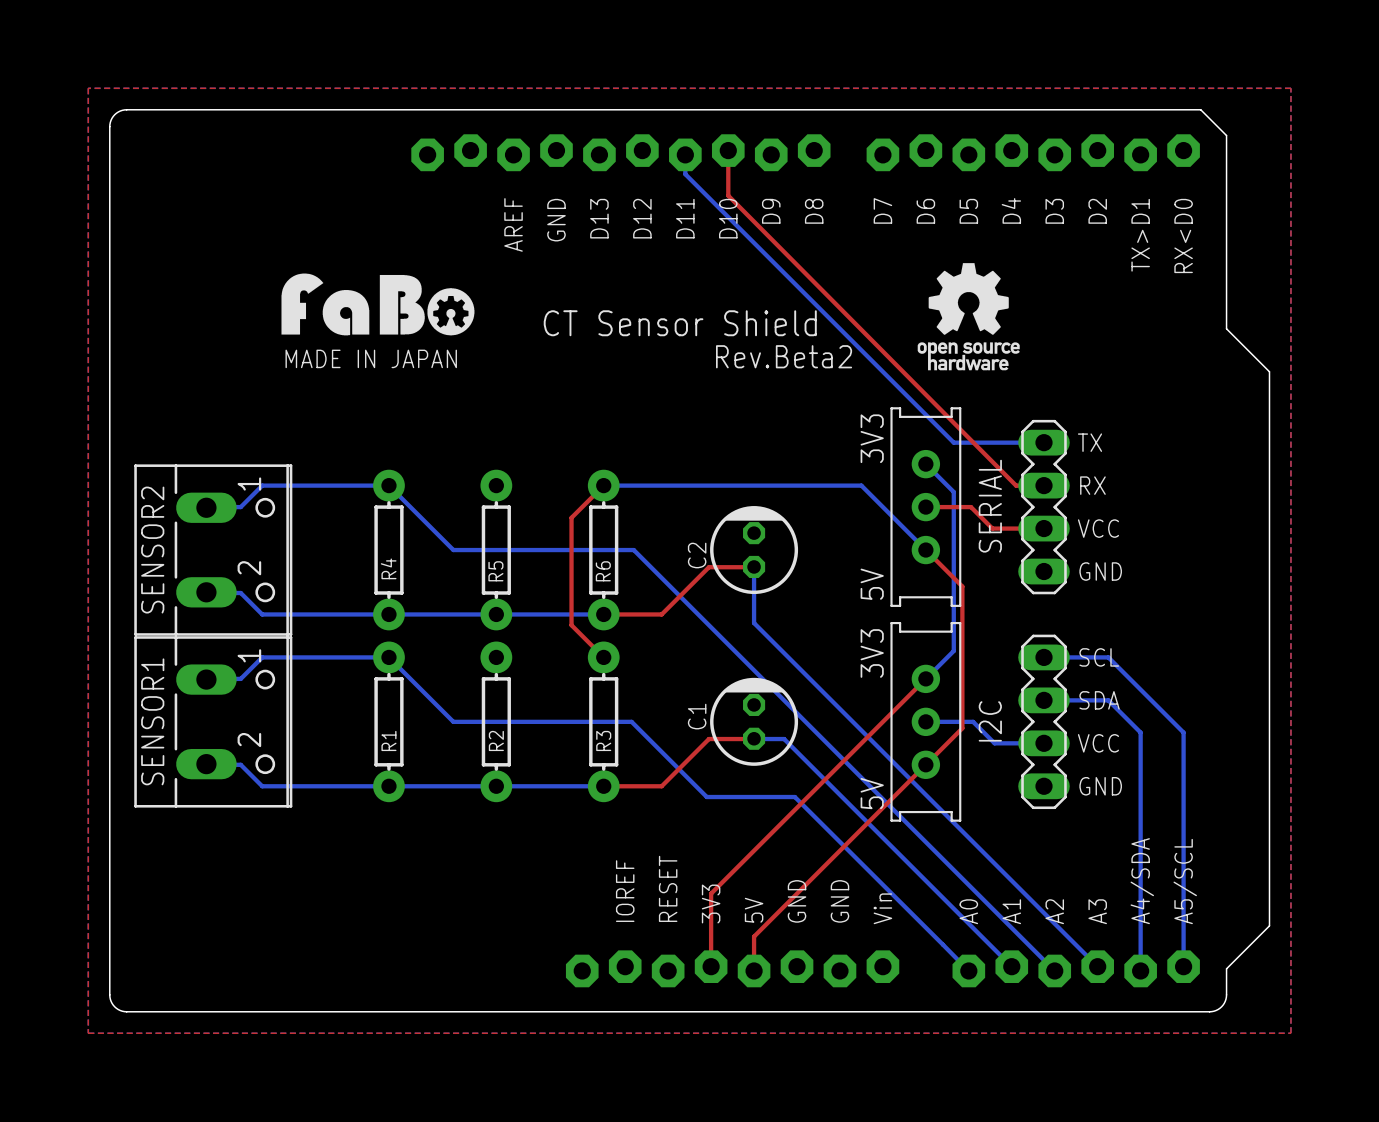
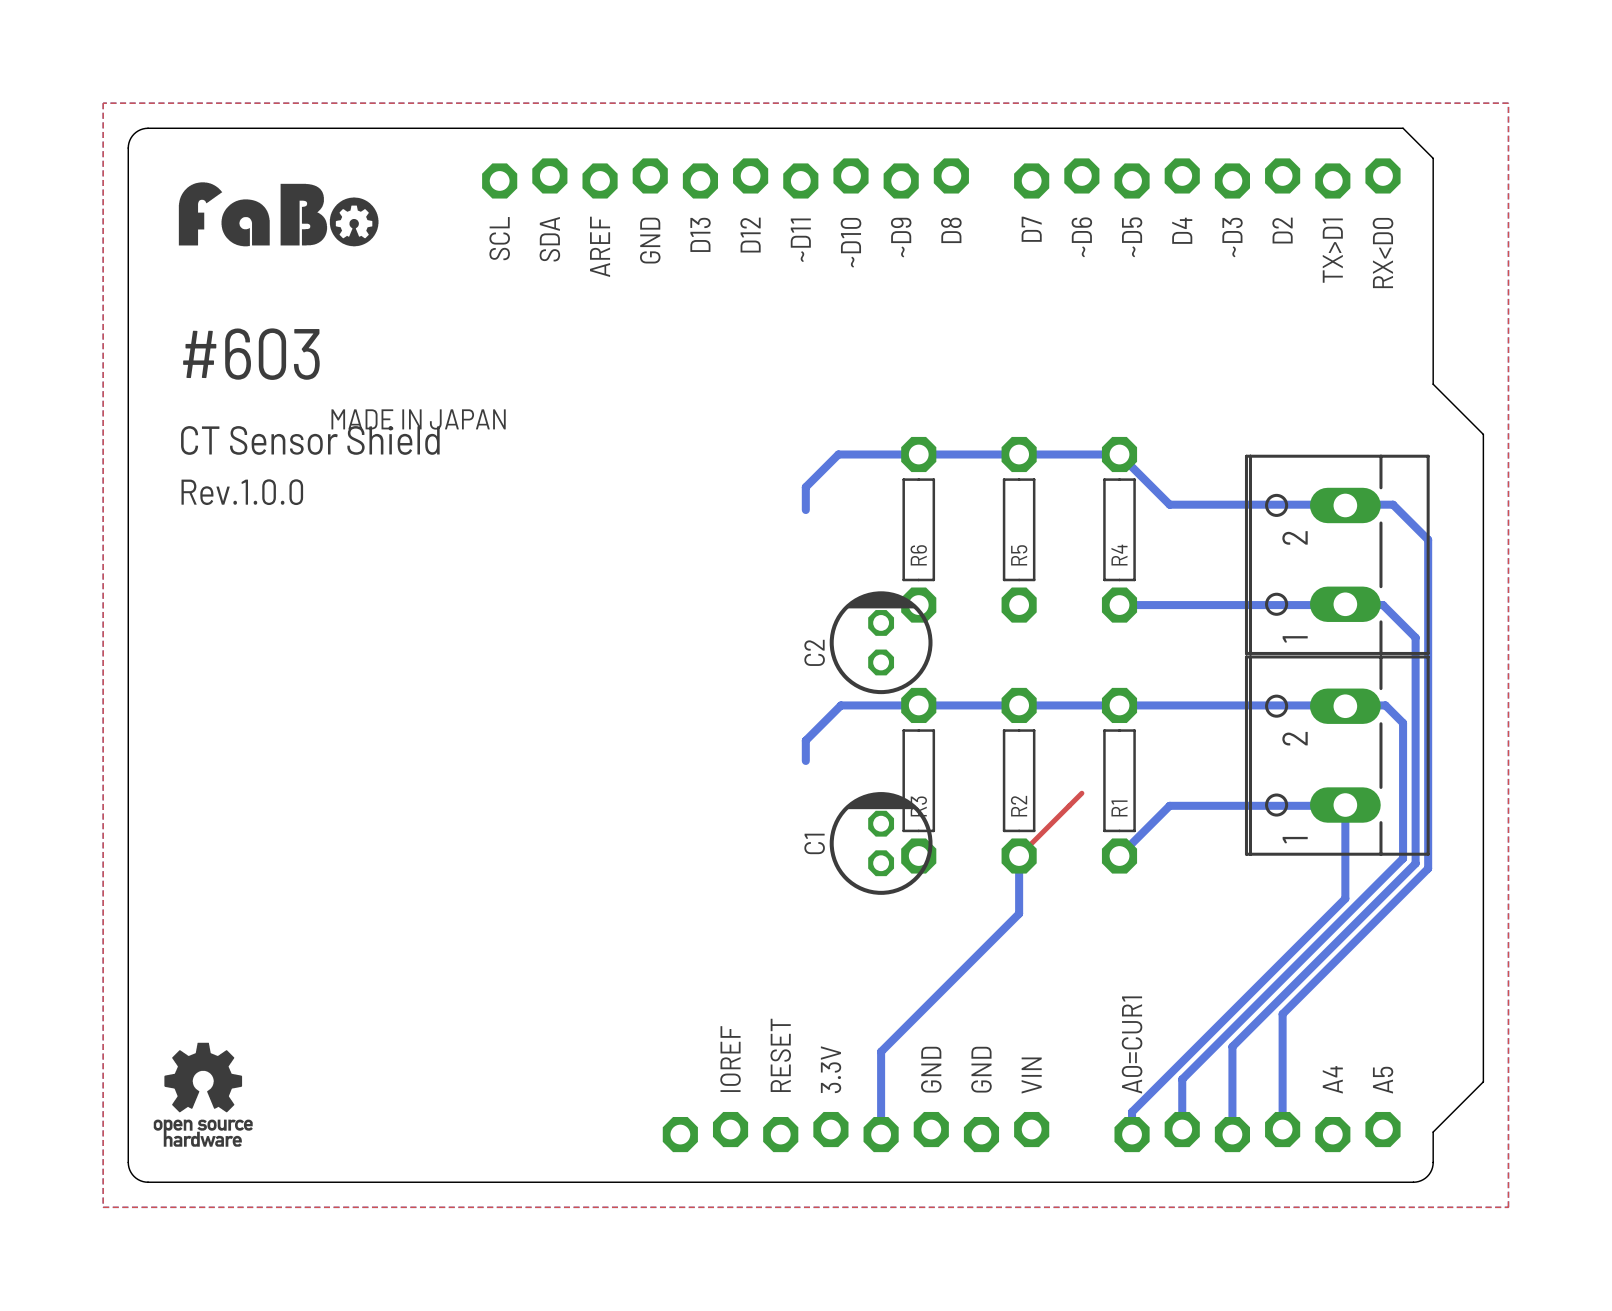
part footprint: [109, 109, 1270, 1012] -> [128, 128, 1484, 1183]
top track: (728, 150) (728, 195) (1016, 485) (1043, 485) -> none
bottom track: (685, 154) (685, 174) (953, 442) (1043, 442) -> none
drawing: none -> [178, 182, 379, 247]
text: none -> D7 (1031, 229)
text: none -> D4 (1182, 230)
text: none -> D8 (951, 230)
text: none -> D2 (1282, 230)
text: none -> SCL (499, 238)
text: none -> SDA (549, 239)
text: none -> ~D9 (901, 237)
text: none -> ~D6 (1081, 237)
text: none -> ~D5 (1132, 237)
text: none -> ~D3 (1232, 237)
text: none -> D13 (700, 234)
text: none -> D12 (750, 235)
text: none -> GND (650, 240)
text: none -> AREF (600, 246)
text: none -> ~D11 (800, 240)
text: none -> ~D10 (851, 242)
text: none -> TX>D1 (1332, 250)
text: none -> RX<D0 (1383, 253)
drawing: [917, 263, 1020, 371] -> none
drawing: [281, 273, 475, 336] -> none
text: none -> #603 (251, 354)
text position: CT Sensor Shield (680, 323) -> CT Sensor Shield (310, 440)
text: Rev.Beta2 (784, 356) -> none
text: none -> Rev.1.0.0 (242, 492)
text: 3V3 (872, 438) -> none
text: TX (1090, 442) -> none
bottom track: (925, 464) (953, 492) (953, 650) (925, 678) -> none
R4 footprint: [373, 469, 405, 631] -> [1101, 436, 1138, 623]
R5 footprint: [480, 469, 513, 631] -> [1001, 436, 1037, 623]
R6 footprint: [587, 469, 620, 631] -> [901, 436, 937, 623]
part: none -> (1337, 554)
top track: (603, 485) (571, 517) (571, 625) (603, 657) -> none
bottom track: (603, 485) (861, 485) (925, 550) -> none
text: RX (1092, 485) -> none
text: SERIAL (990, 506) -> none
bottom track: (206, 507) (240, 507) (262, 485) (388, 485) (453, 550) (633, 550) (1054, 970) -> (1119, 605) (1382, 605) (1415, 637) (1415, 863) (1232, 1046) (1232, 1134)
top track: (925, 507) (970, 507) (992, 528) (1043, 528) -> none
part: (925, 507) -> none
part: (1043, 507) -> none
text: VCC (1098, 528) -> none
text: SENSOR2 (152, 550) -> none
part: (213, 550) -> none
top track: (925, 550) (962, 586) (962, 728) (754, 936) (754, 970) -> none
top track: (754, 566) (708, 567) (661, 614) (603, 614) -> none
bottom track: (754, 566) (754, 623) (1097, 966) -> (805, 510) (805, 487) (838, 454) (1119, 454) (1169, 504) (1393, 504) (1428, 539) (1428, 868) (1282, 1014) (1282, 1129)
text: GND (1100, 571) -> none
text: 5V (872, 584) -> none
bottom track: (206, 592) (240, 592) (262, 614) (603, 614) -> none
R1 footprint: [373, 641, 405, 803] -> [1101, 687, 1138, 874]
R2 footprint: [480, 641, 513, 803] -> [1001, 687, 1037, 874]
R3 footprint: [587, 641, 620, 803] -> [901, 687, 937, 874]
part: none -> (1337, 755)
text: 3V3 (872, 653) -> none
bottom track: (1043, 657) (1108, 657) (1183, 732) (1183, 966) -> none
text: SCL (1099, 657) -> none
bottom track: (206, 679) (240, 678) (262, 657) (388, 657) (453, 721) (631, 721) (706, 797) (794, 797) (968, 970) -> (1119, 856) (1169, 805) (1345, 805) (1345, 898) (1132, 1111) (1132, 1134)
bottom track: (1043, 700) (1108, 700) (1140, 732) (1140, 970) -> none
text: SDA (1099, 700) -> none
text: SENSOR1 (152, 721) -> none
part: (213, 721) -> none
bottom track: (925, 721) (973, 721) (994, 743) (1043, 743) -> none
part: (925, 721) -> none
text: I2C (990, 721) -> none
part: (1043, 721) -> none
top track: (872, 732) (711, 893) (711, 966) -> none
bottom track: none -> (1019, 856) (1019, 913) (881, 1051) (881, 1134)
top track: (754, 738) (708, 739) (661, 786) (603, 786) -> none
bottom track: (754, 738) (784, 739) (1011, 966) -> (805, 760) (805, 740) (840, 705) (1385, 705) (1403, 723) (1403, 858) (1182, 1079) (1182, 1129)
text: VCC (1098, 743) -> none
bottom track: (206, 764) (240, 764) (262, 786) (603, 786) -> none
text: GND (1100, 786) -> none
text: 5V (872, 793) -> none
text: none -> A0=CUR1 (1132, 1044)
drawing: none -> [153, 1042, 253, 1147]
text: none -> RESET (780, 1055)
text: none -> IOREF (730, 1059)
text: none -> 3.3V (831, 1069)
text: none -> GND (931, 1069)
text: none -> GND (981, 1069)
text: none -> VIN (1031, 1075)
text: none -> A4 (1332, 1079)
text: none -> A5 (1383, 1080)

